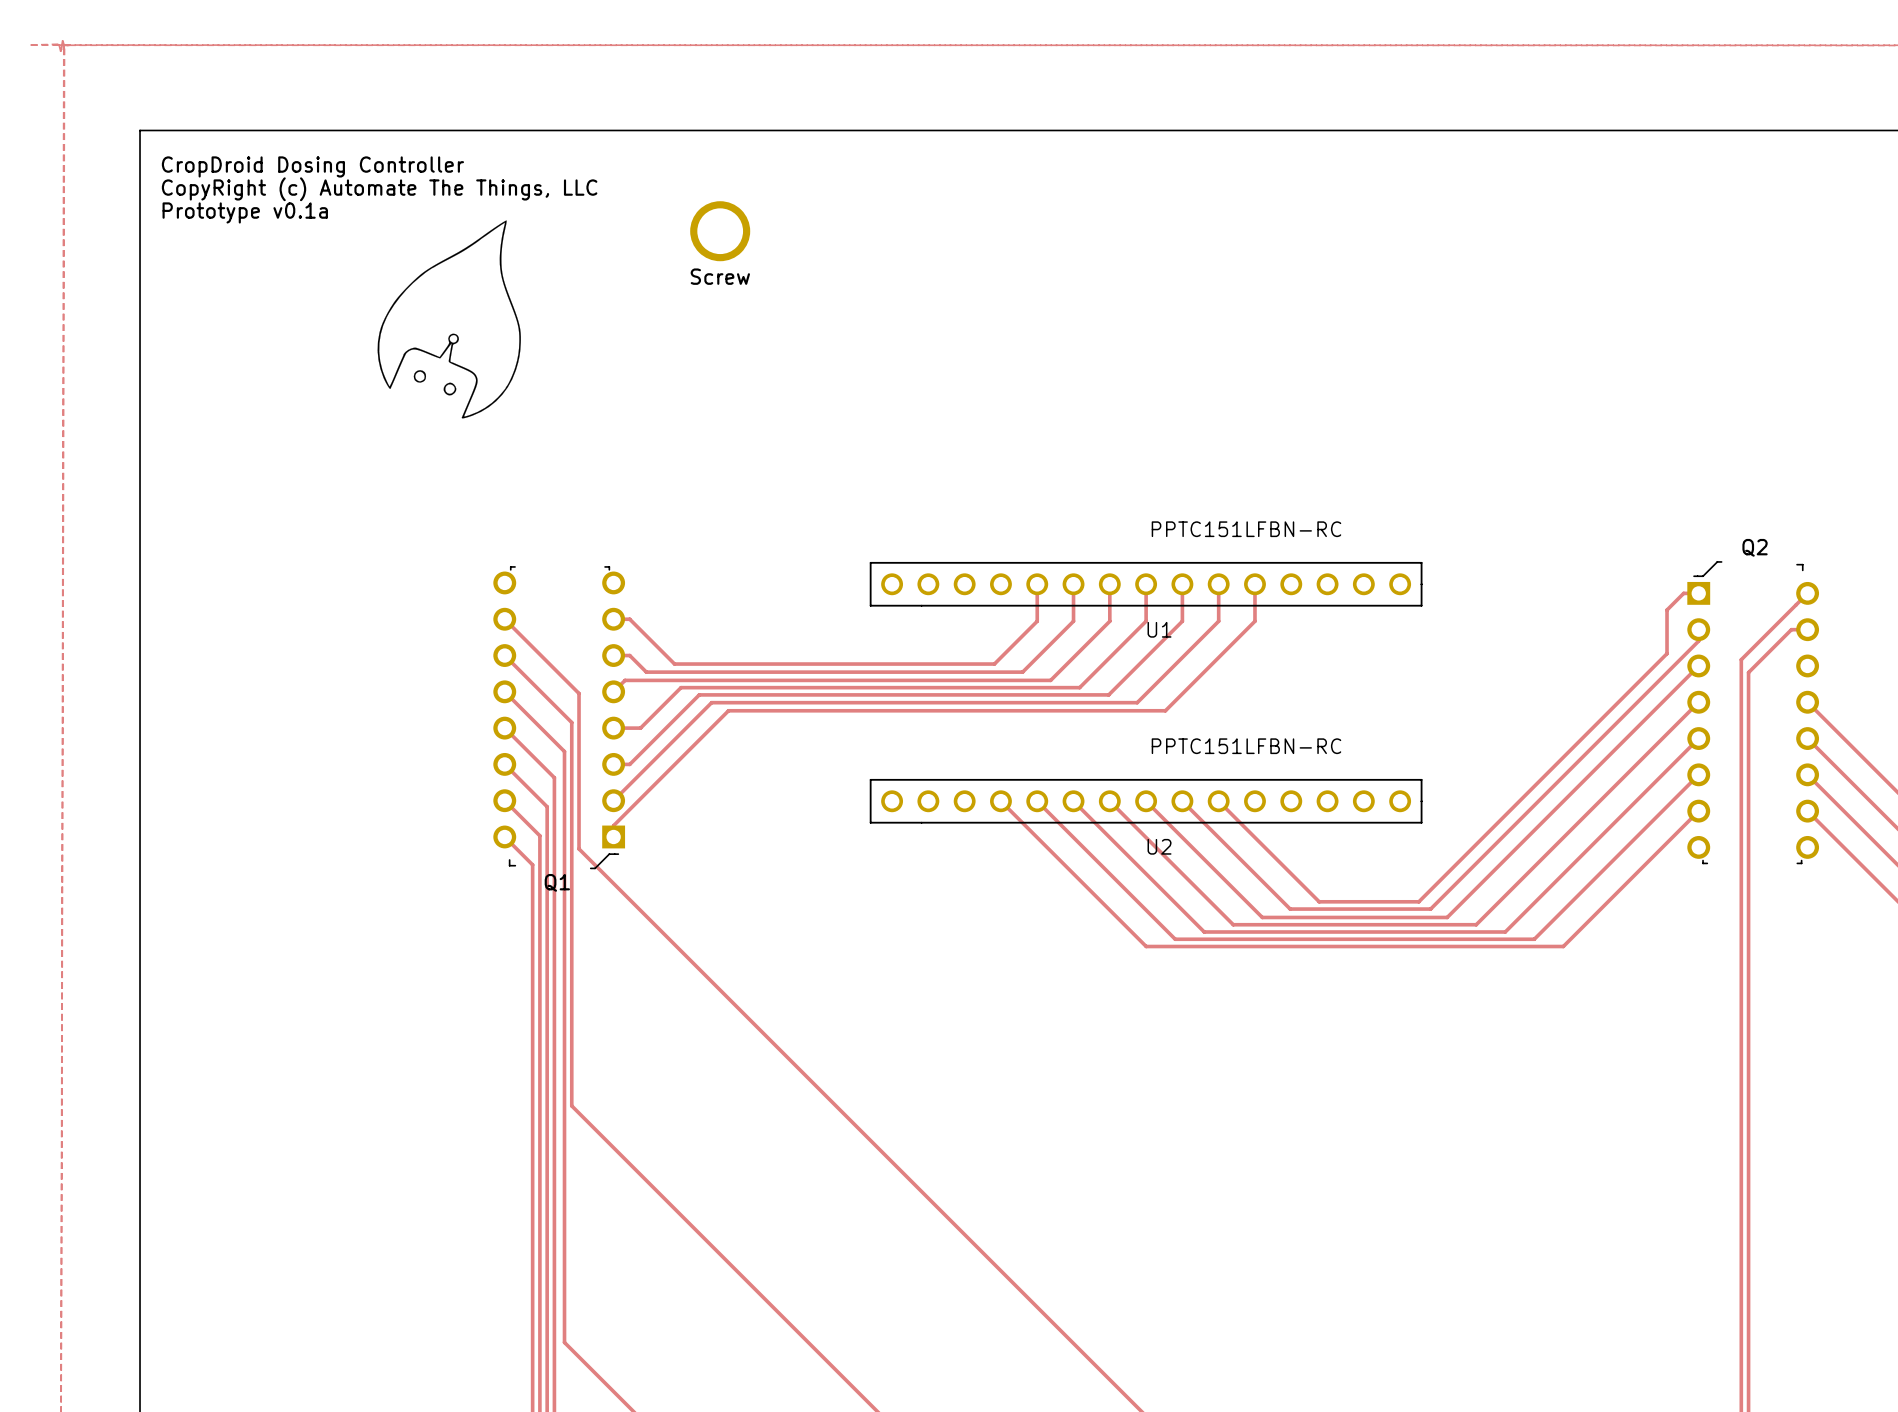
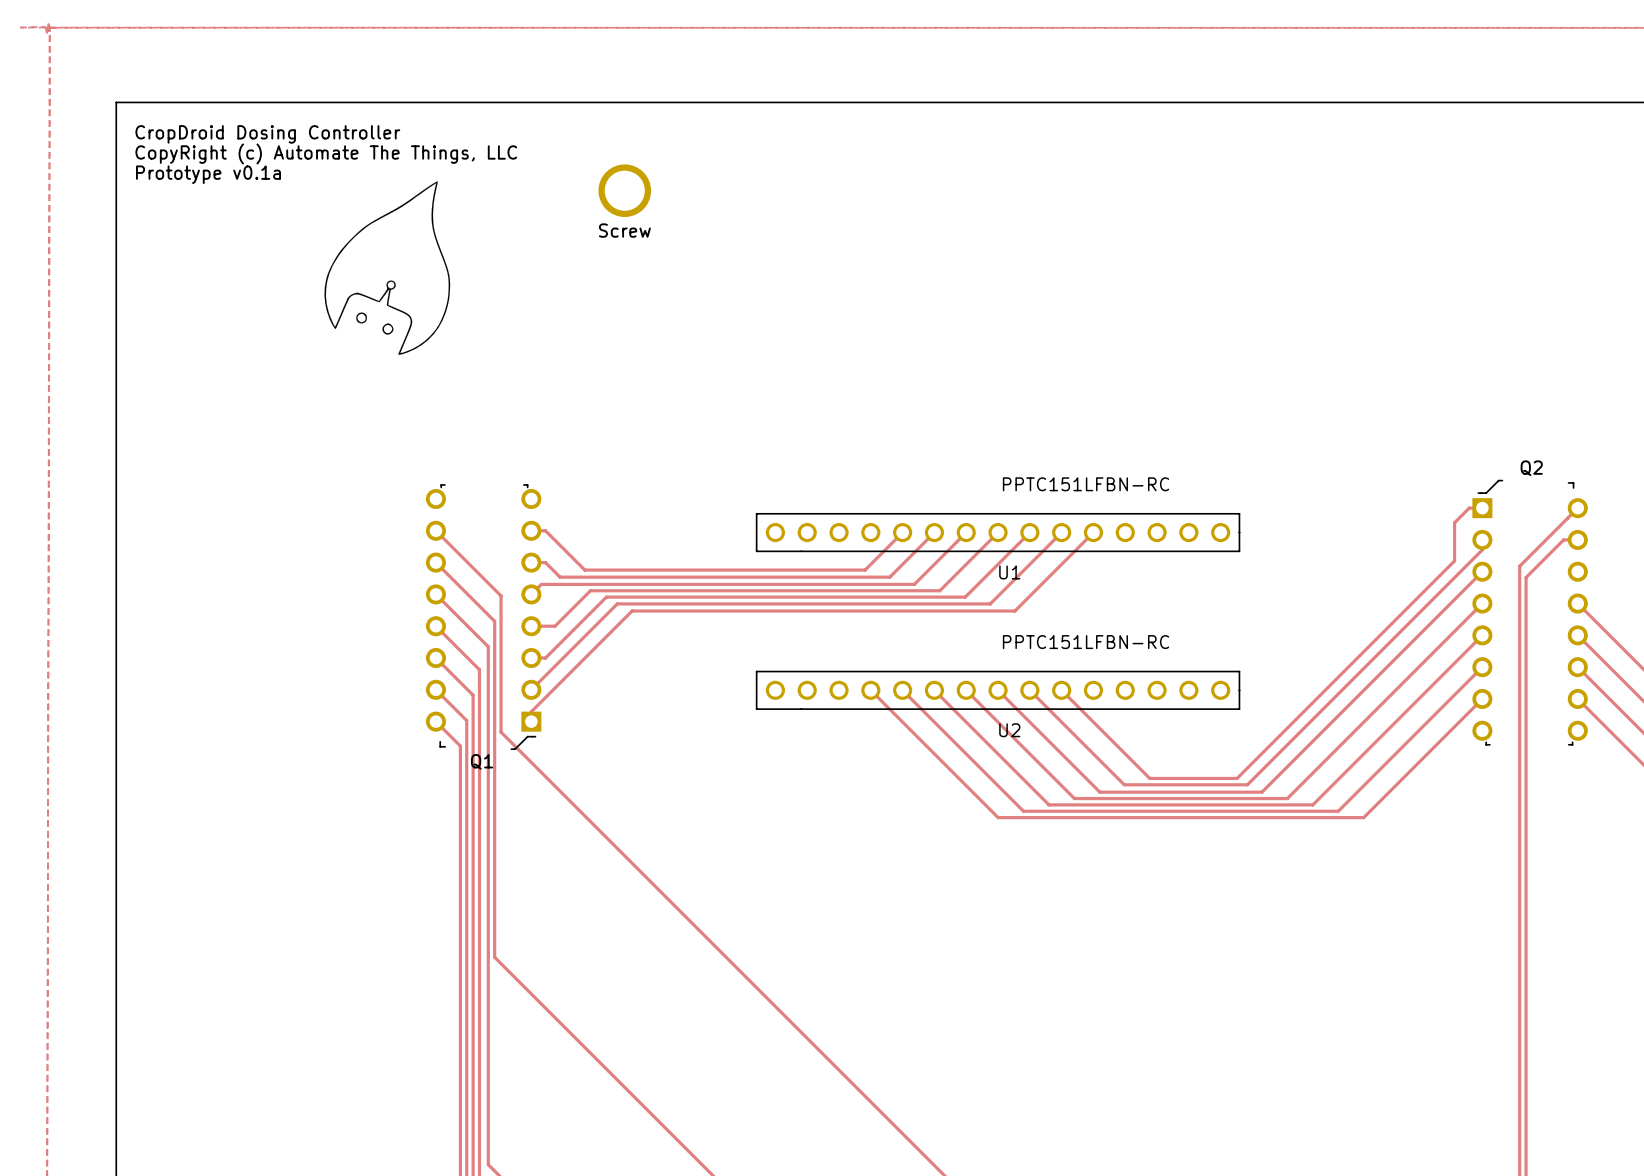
track: (1037, 584) (1037, 621) -> none
track: (1073, 584) (1073, 621) -> none
track: (1109, 584) (1109, 621) -> none
track: (1146, 584) (1146, 621) -> none
U1 position: (1146, 584) -> (998, 532)
track: (1182, 584) (1182, 621) -> none
track: (1218, 584) (1218, 621) -> none
track: (1254, 584) (1254, 621) -> none

